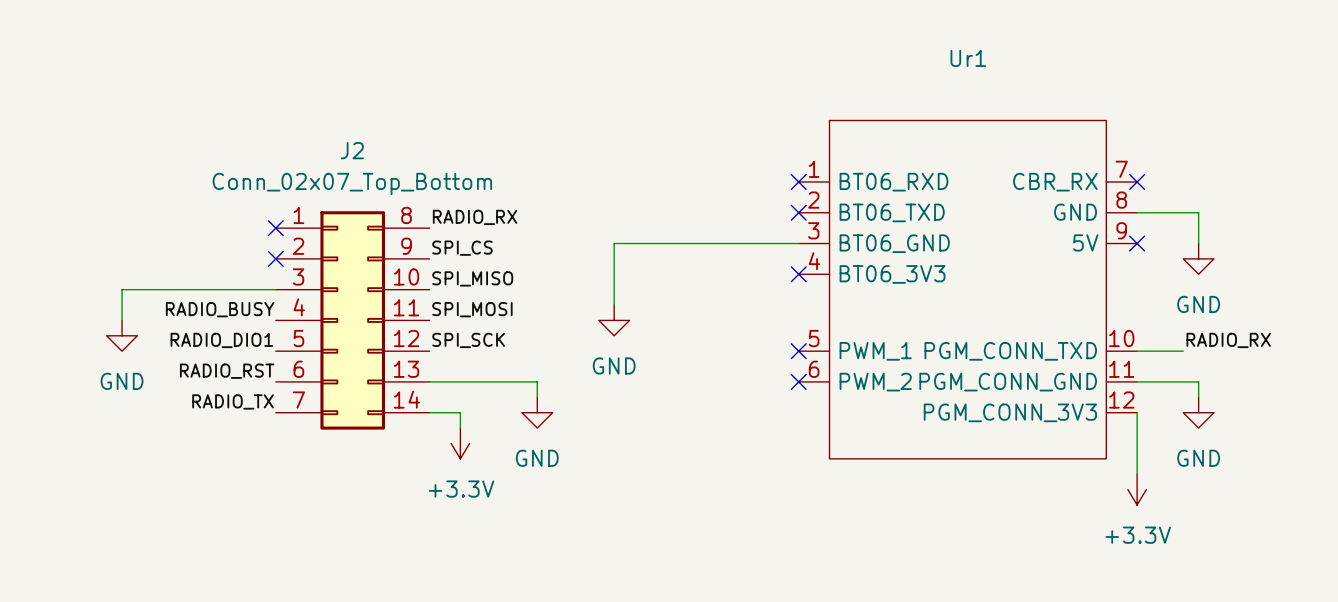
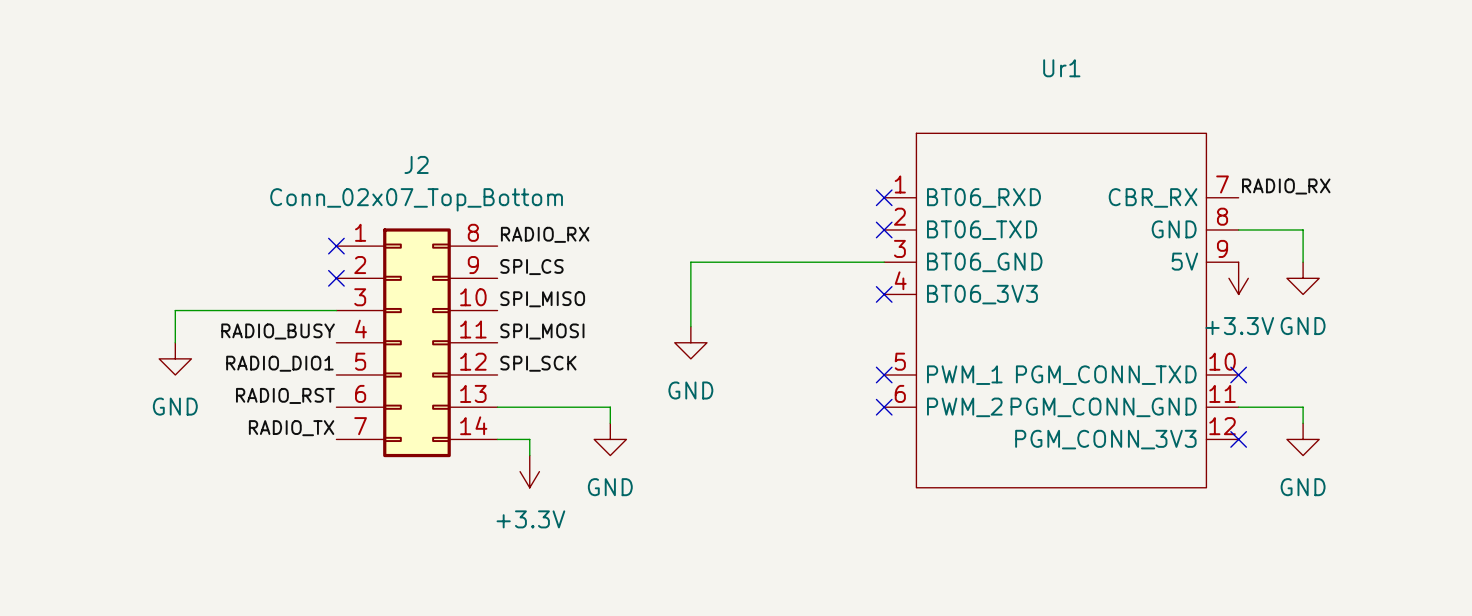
no-connect mark: (1137, 182) -> none
no-connect mark: (1137, 243) -> none
label position: RADIO_RX (1228, 340) -> RADIO_RX (1286, 186)
wire: (1137, 351) (1183, 351) -> none
no-connect mark: none -> (1238, 374)
wire: (1137, 412) (1137, 474) -> none
no-connect mark: none -> (1238, 439)
power symbol position: +3.3V (1137, 489) -> +3.3V (1238, 278)

